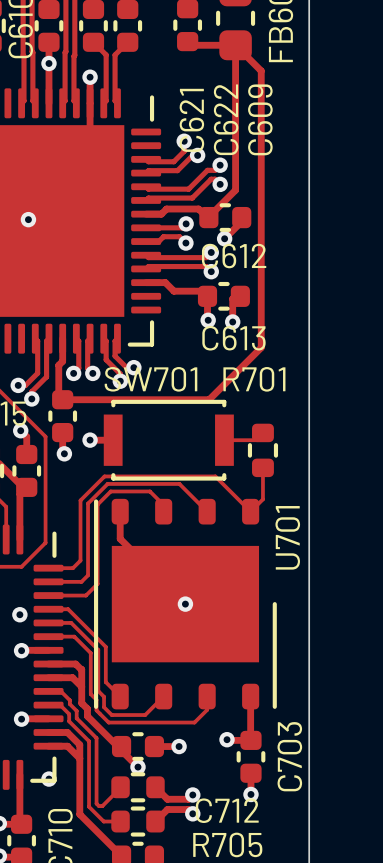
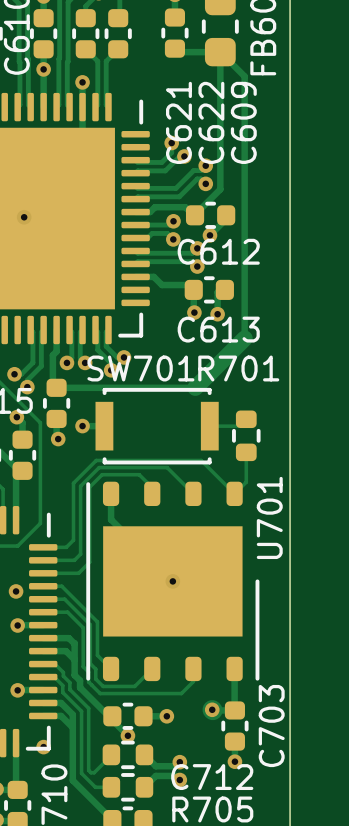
track width: thin (261, 347) (209, 399) -> thick (244, 338) (195, 387)

